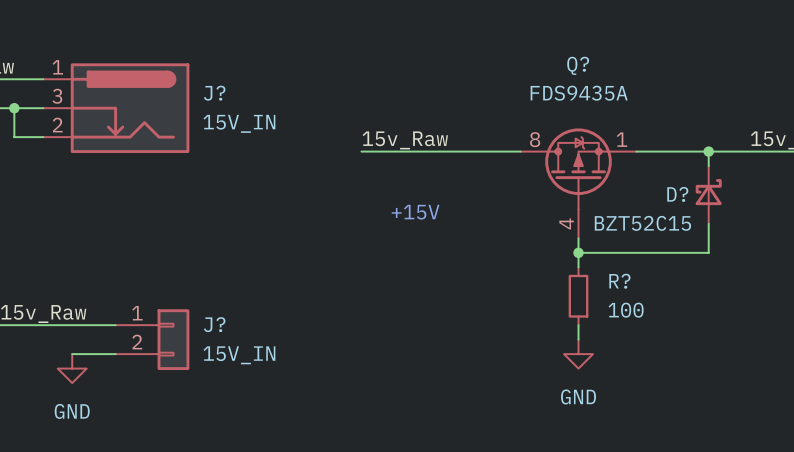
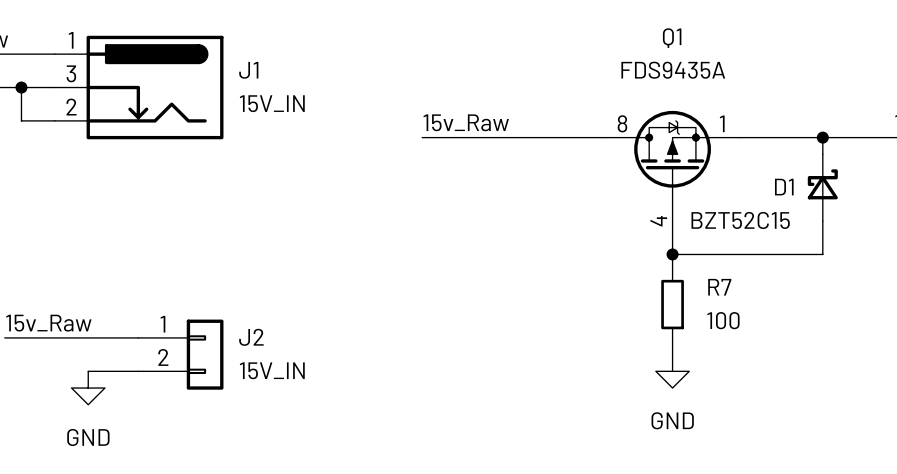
Q? name: Q? (578, 65) -> Q1 (672, 38)
J? name: J? (214, 93) -> J1 (248, 70)
D? name: D? (677, 194) -> D1 (784, 187)
text: +15V (415, 212) -> none
R? name: R? (619, 281) -> R7 (719, 287)
J? name: J? (214, 324) -> J2 (251, 337)

